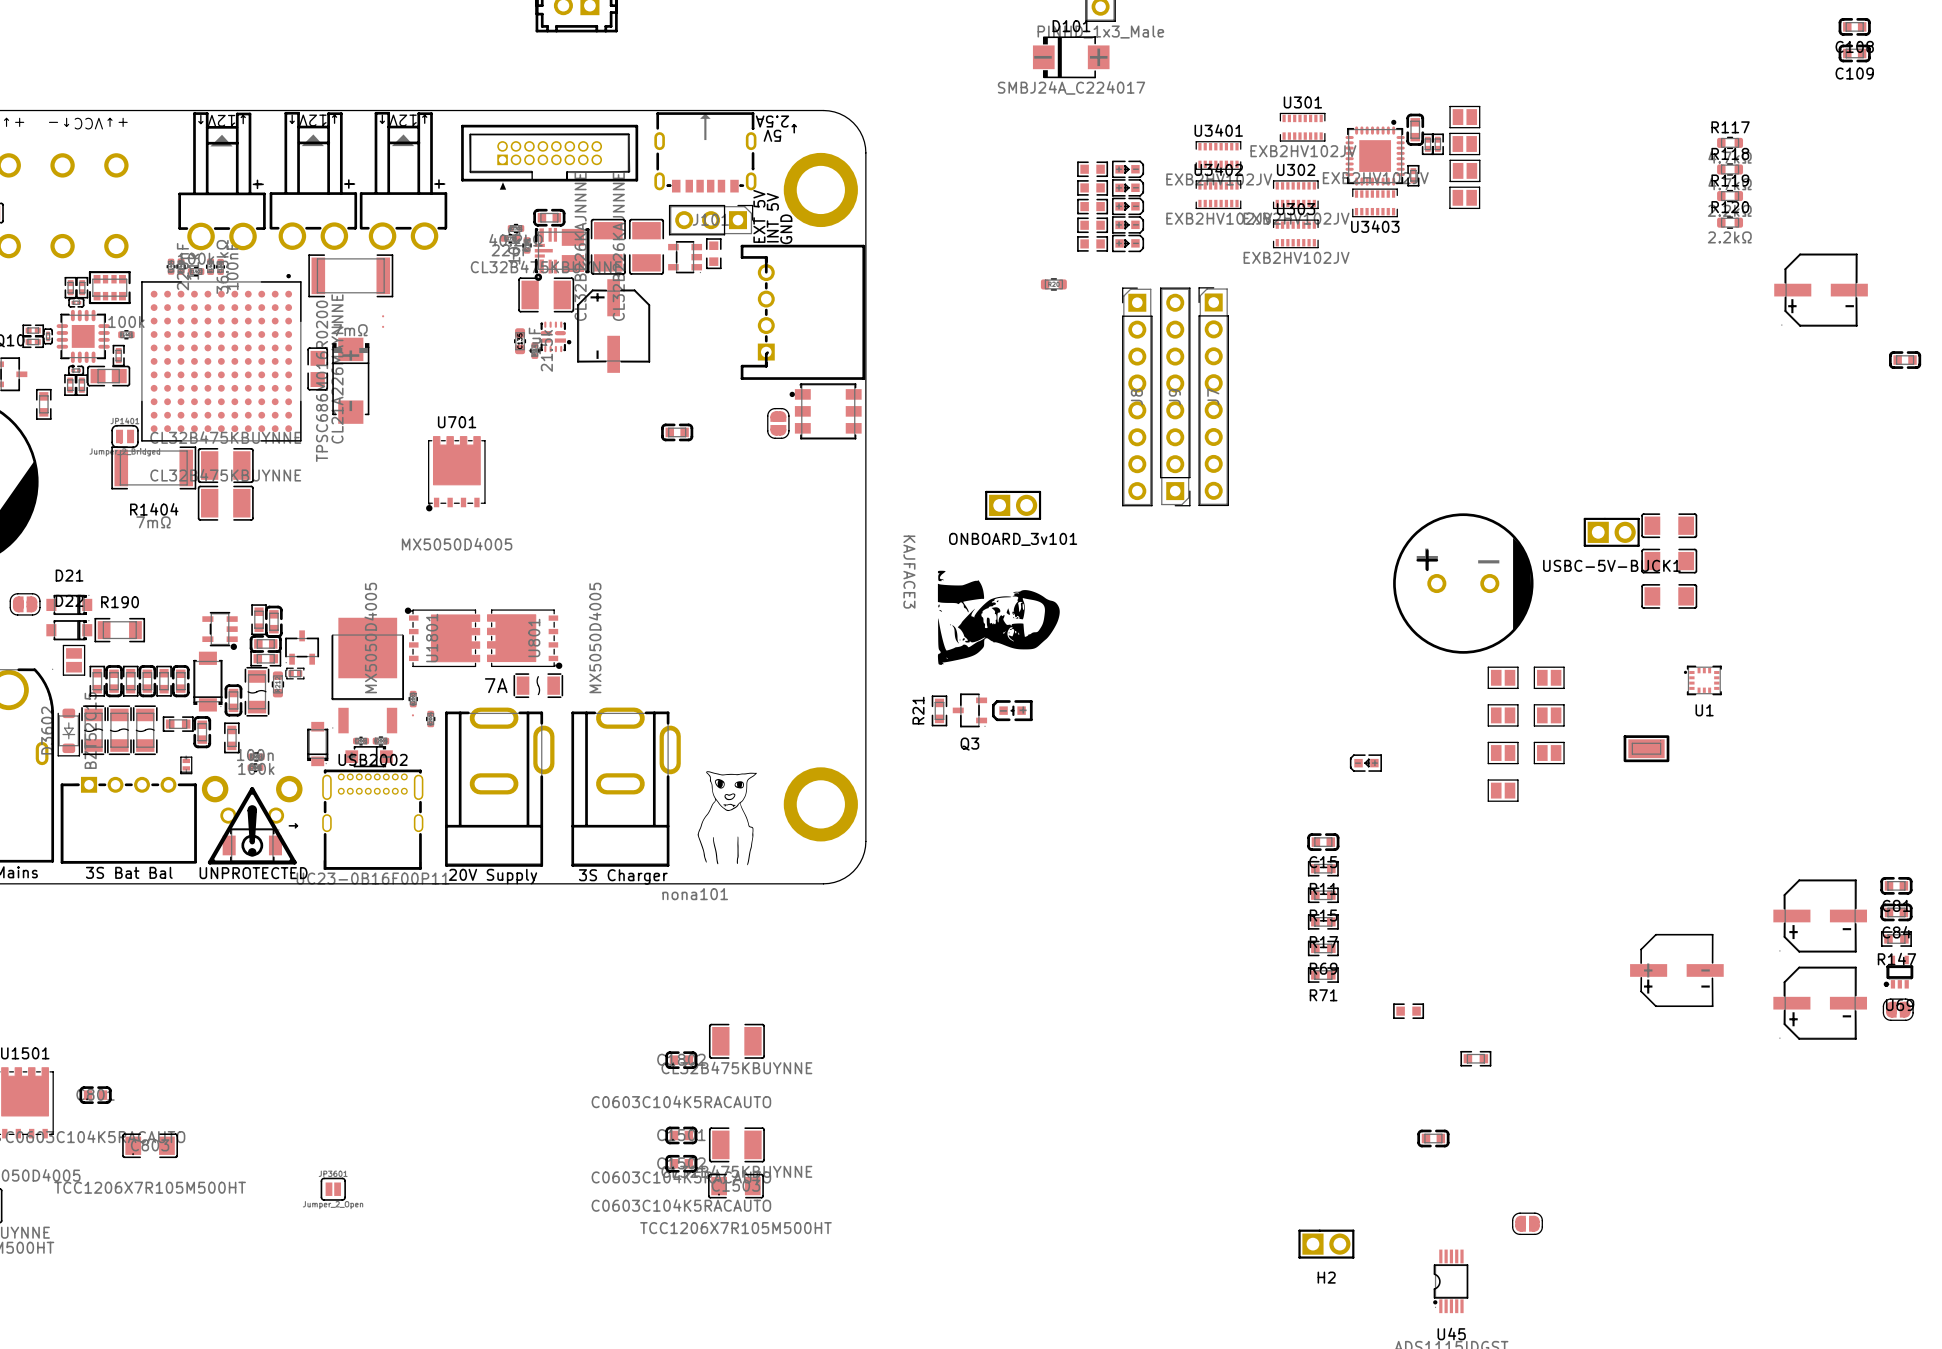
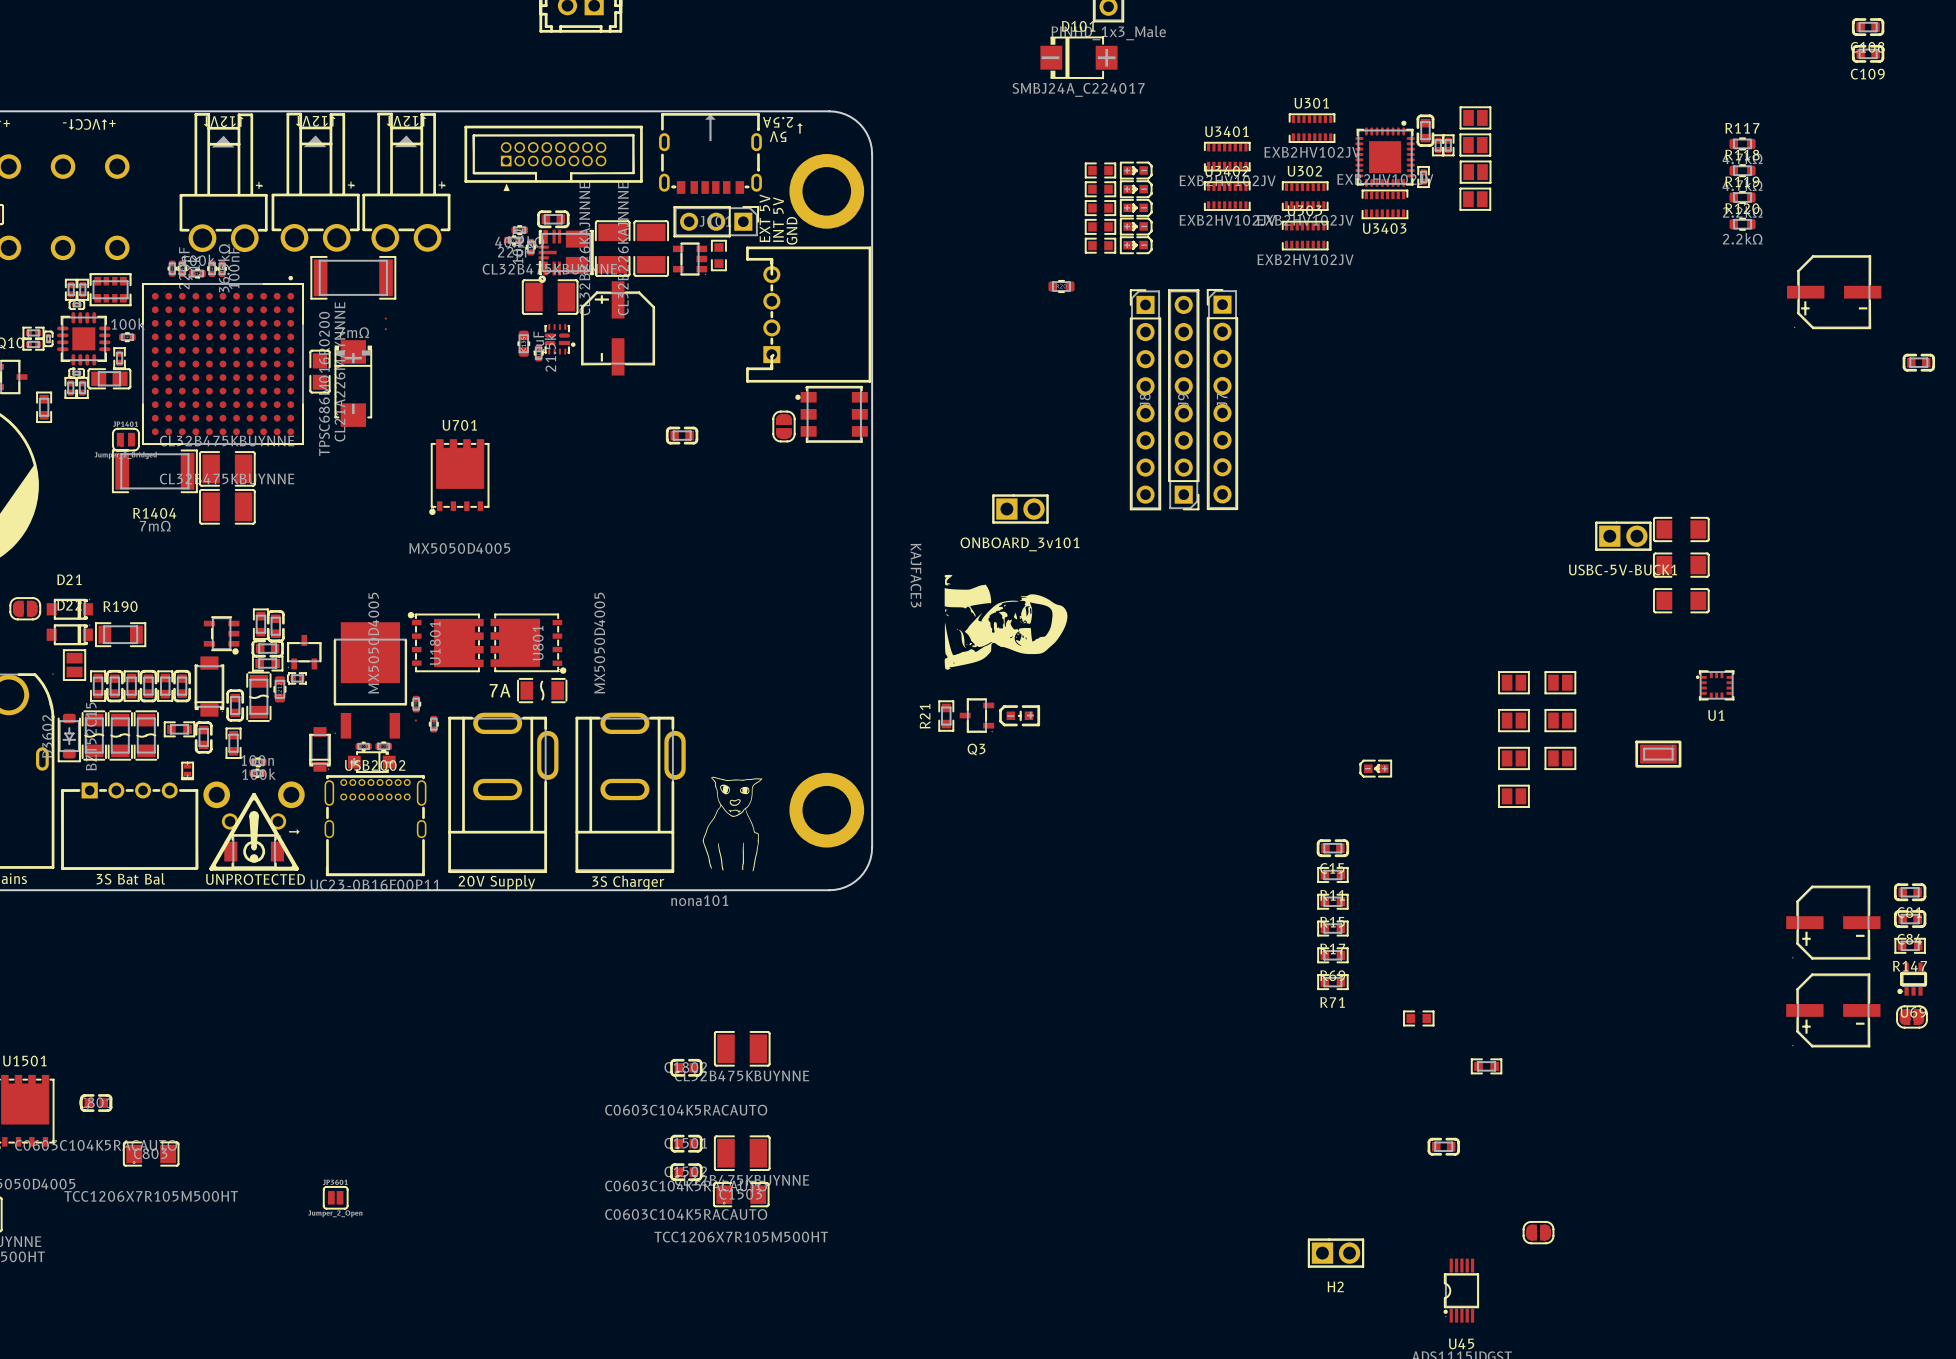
part: (1463, 583) -> none
part: (1676, 970) -> none

